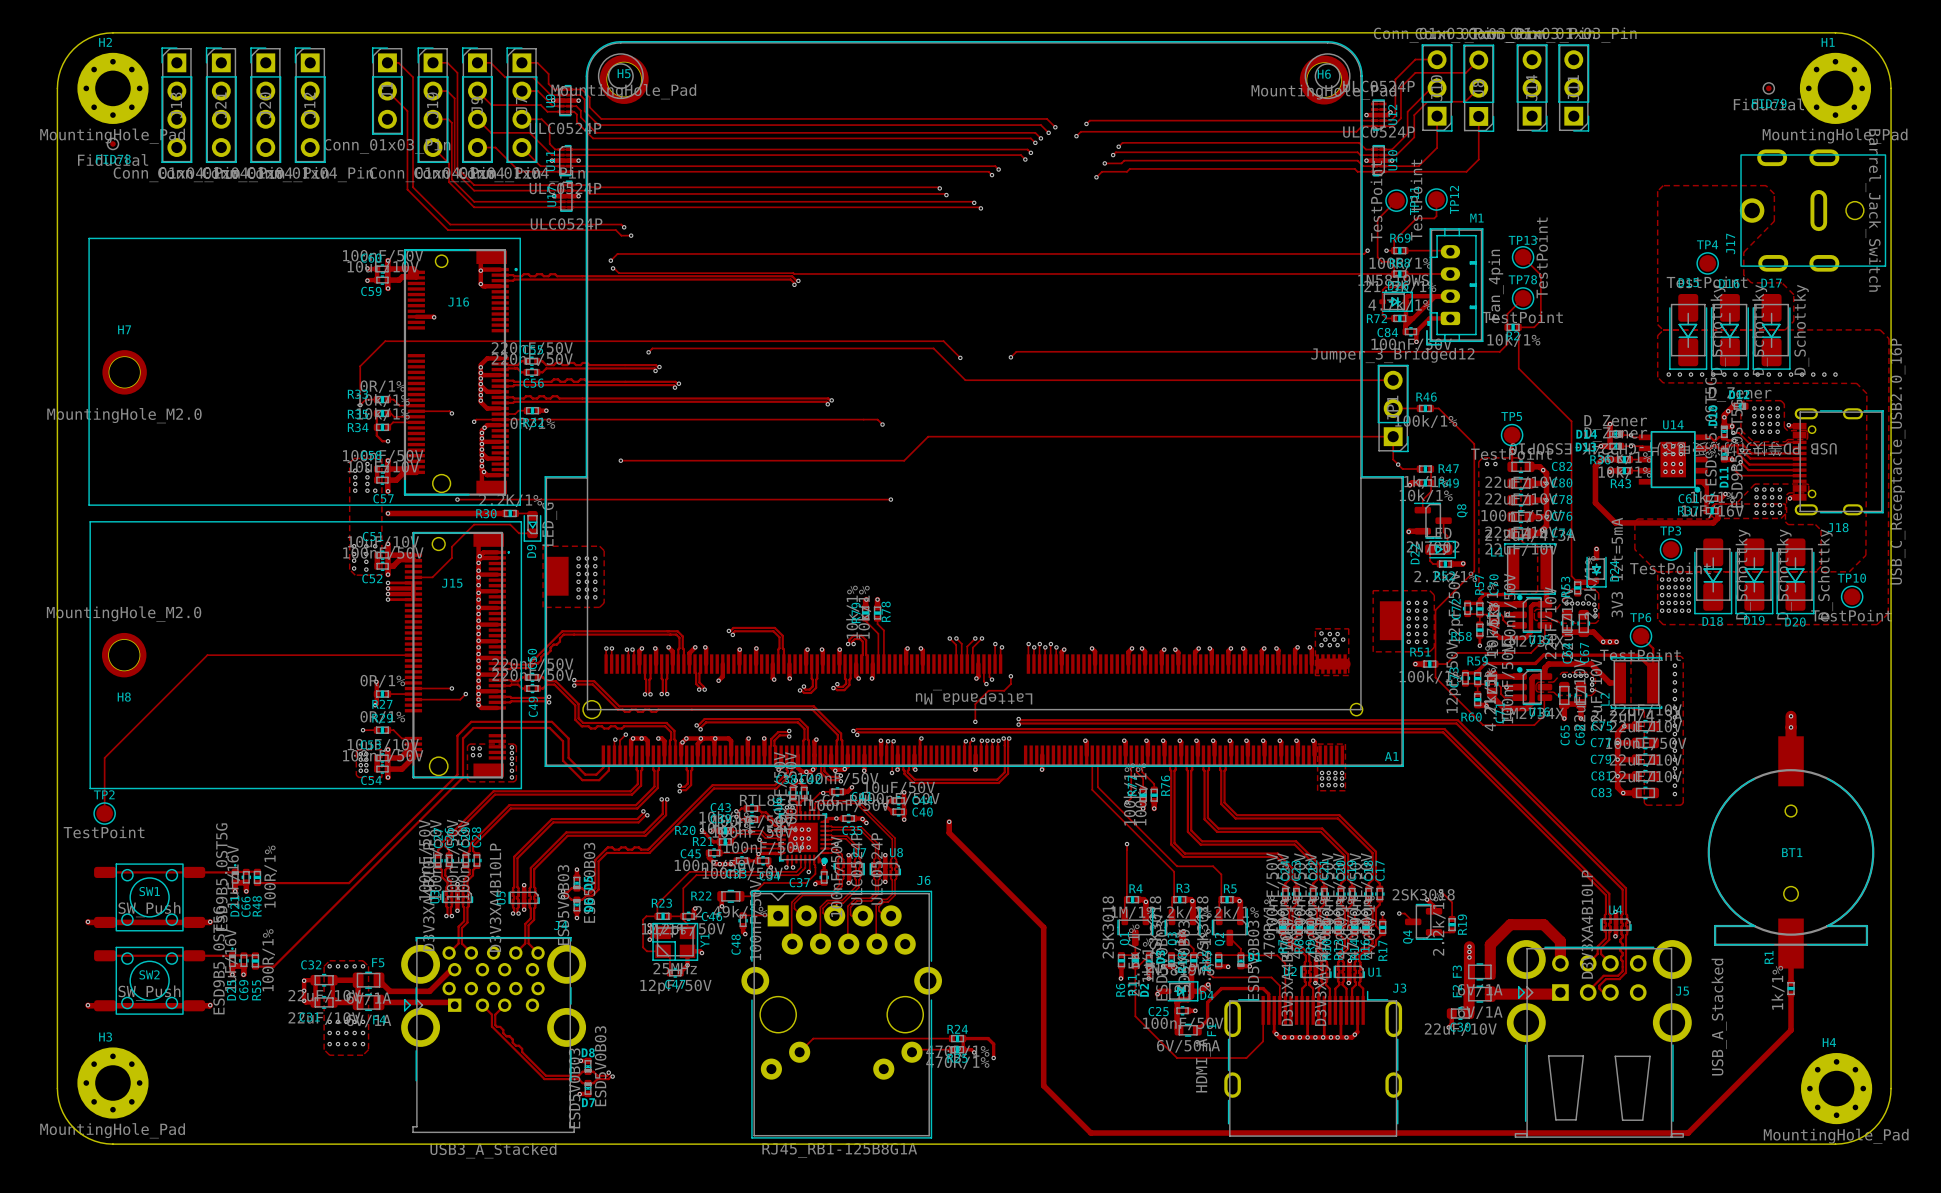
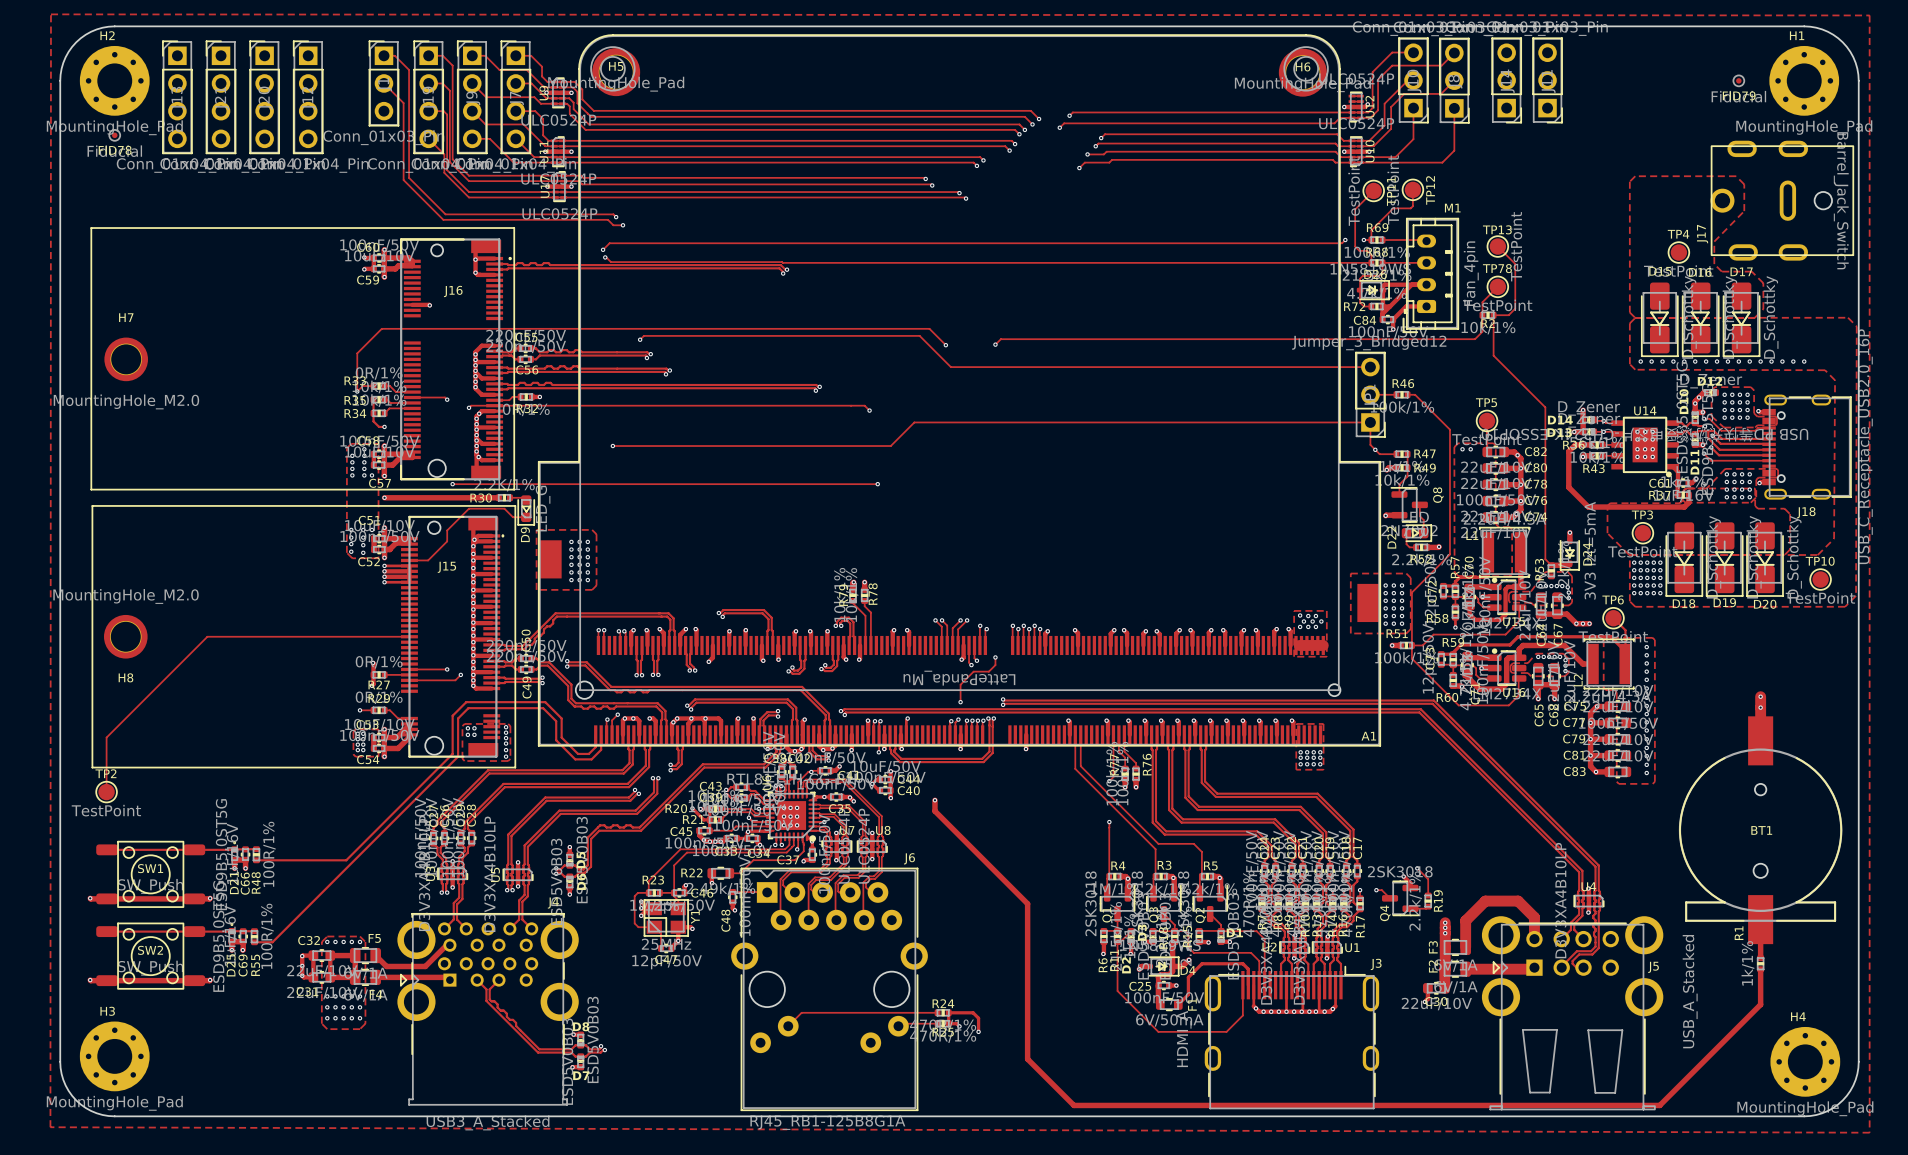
zone outline: none -> (50, 14) (1869, 15) (1869, 1132) (50, 1127) (50, 14)

